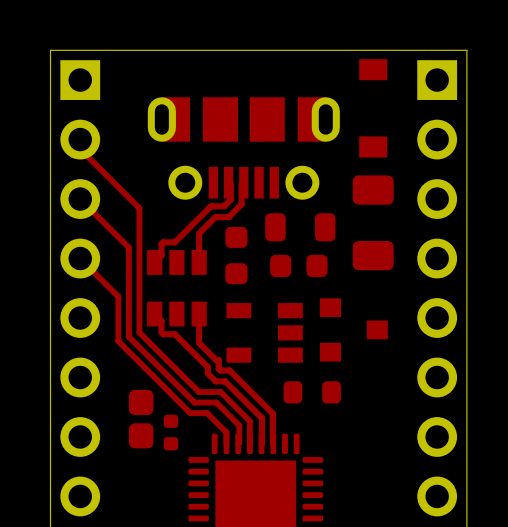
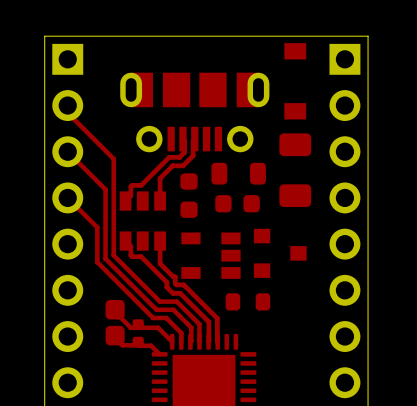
top track: none -> (115, 312) (130, 327) (158, 327) (172, 341)
top track: none -> (115, 337) (122, 345) (151, 345) (159, 354)

